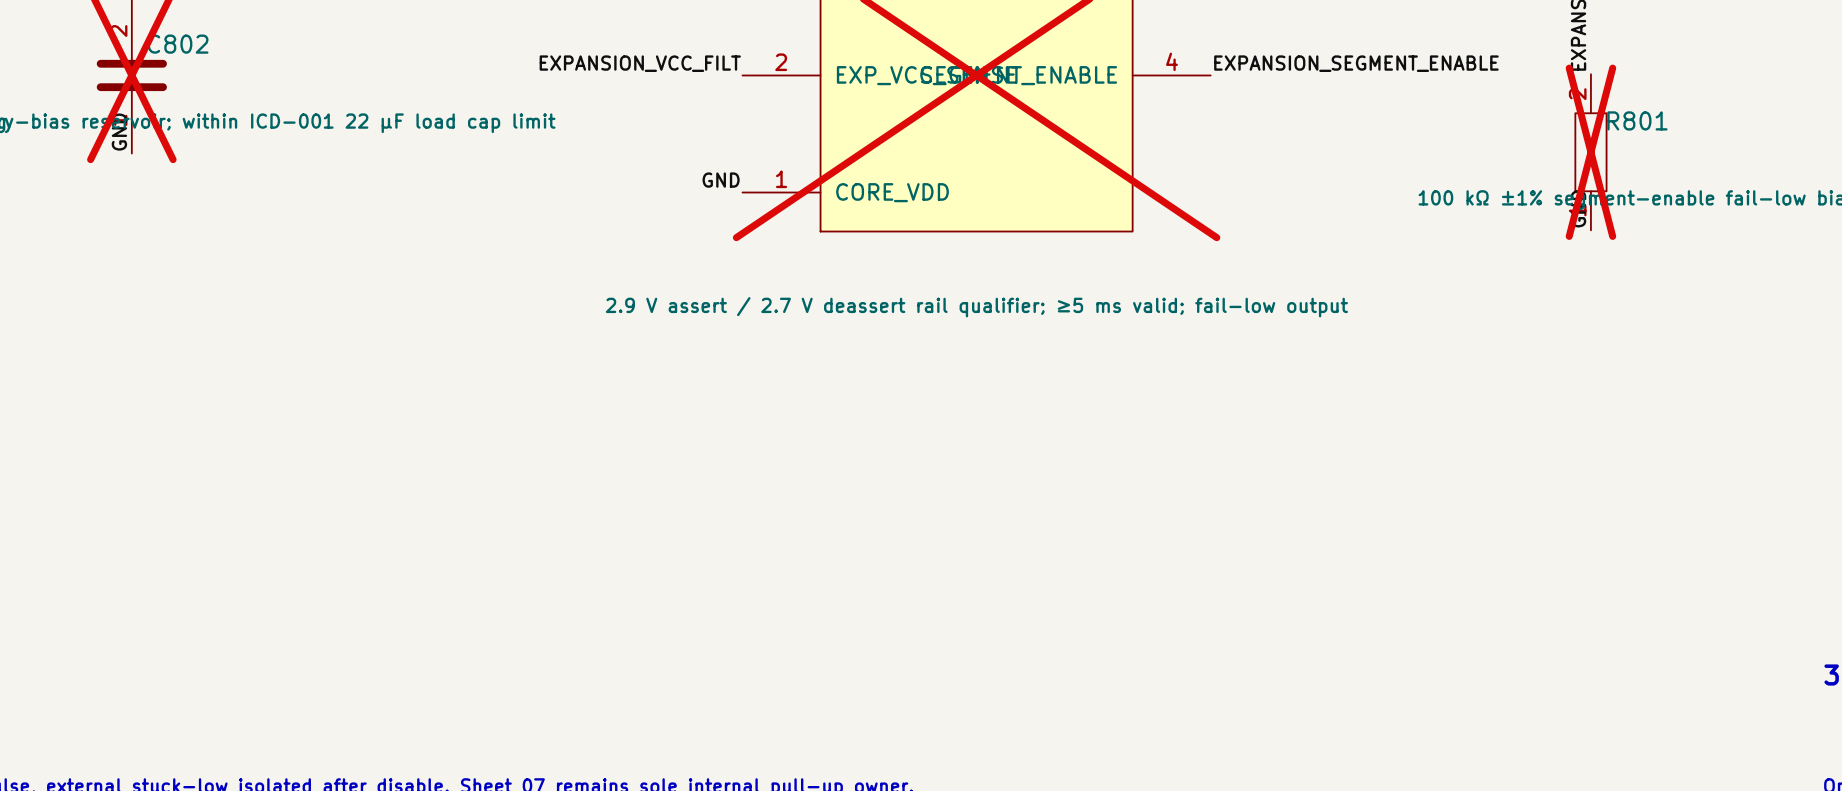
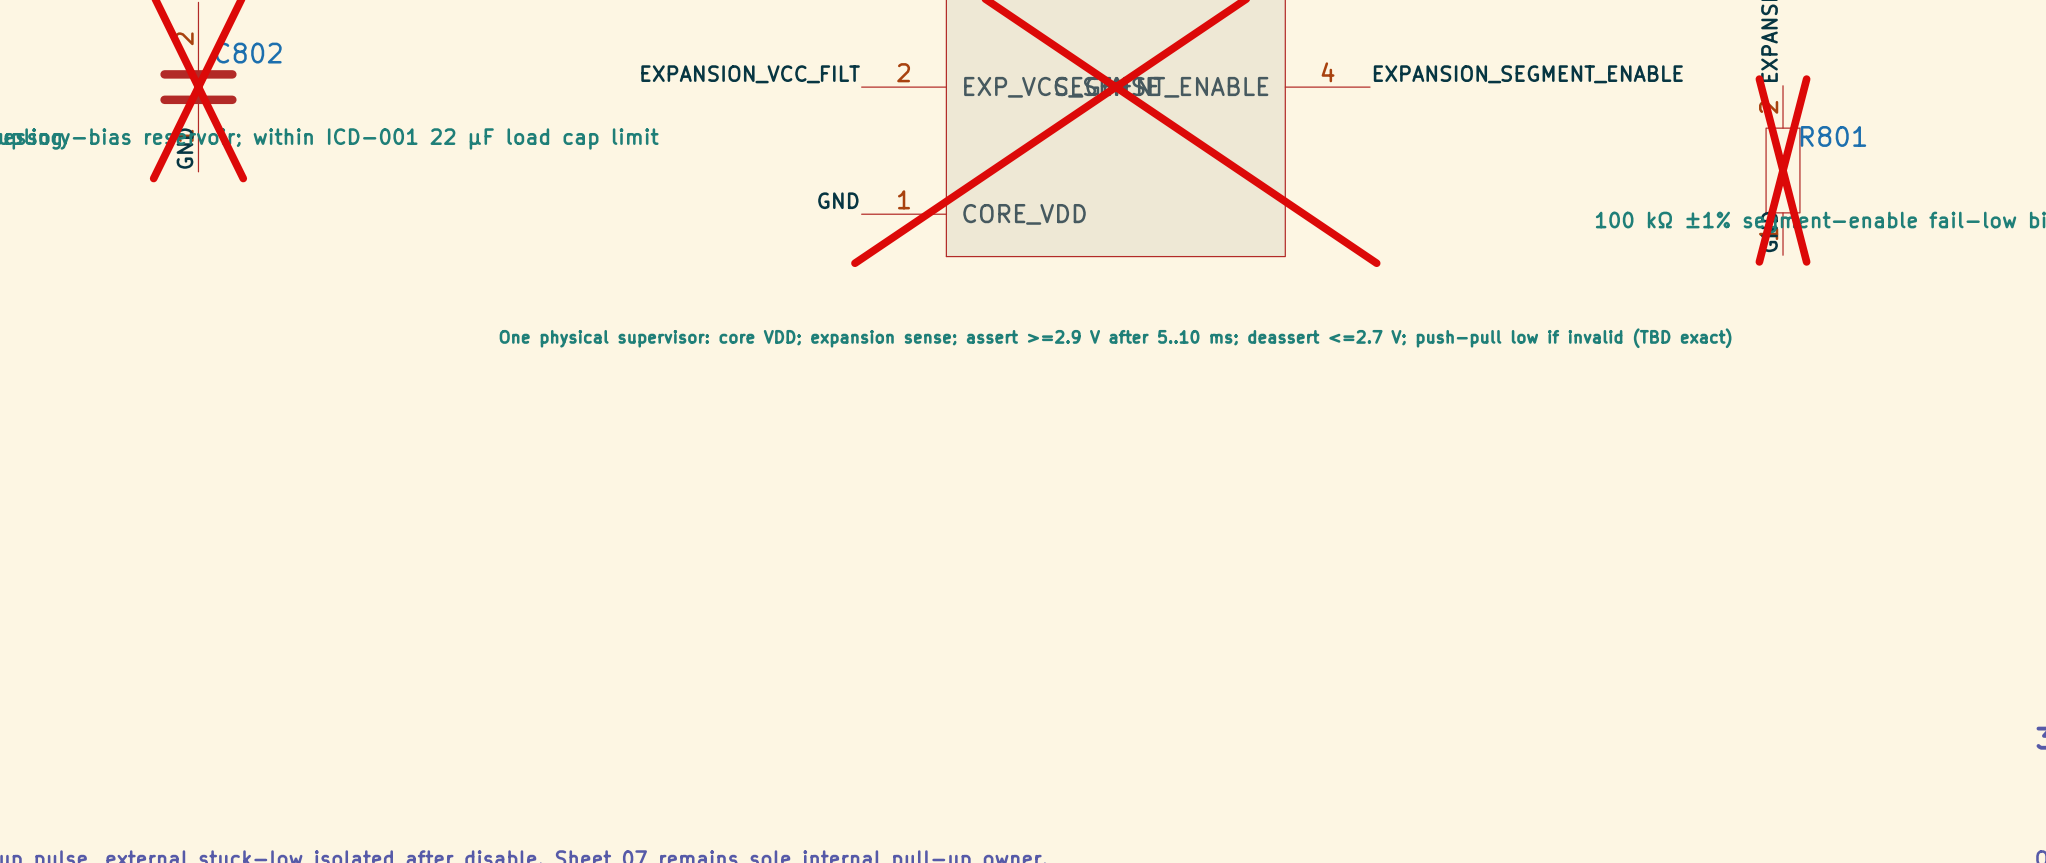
part value: 2.9 V assert / 2.7 V deassert rail qualifier; ≥5 ms valid; fail-low output (976, 307) -> One physical supervisor: core VDD; expansion sense; assert >=2.9 V after 5..10 ms; deassert <=2.7 V; push-pull low if invalid (TBD exact) (1115, 338)

